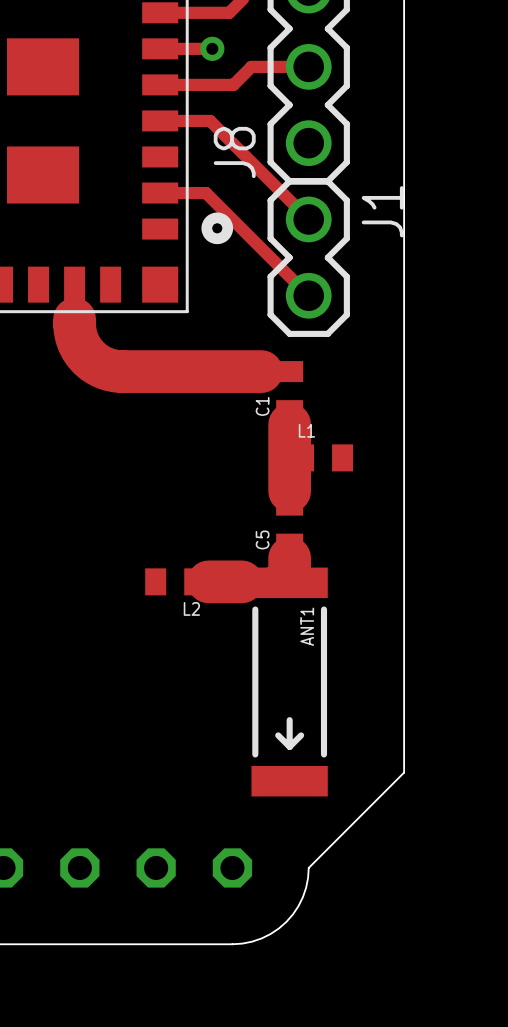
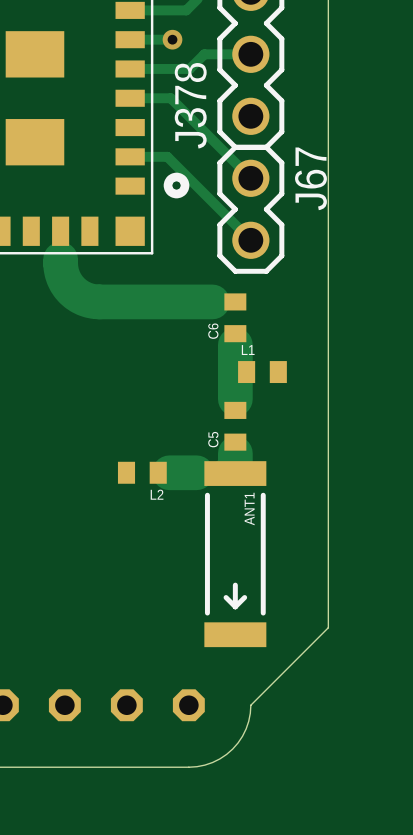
J8 name: J8 (234, 152) -> J378 (190, 105)
J1 name: J1 (382, 211) -> J67 (310, 178)
C1 name: C1 (262, 406) -> C6 (213, 331)

